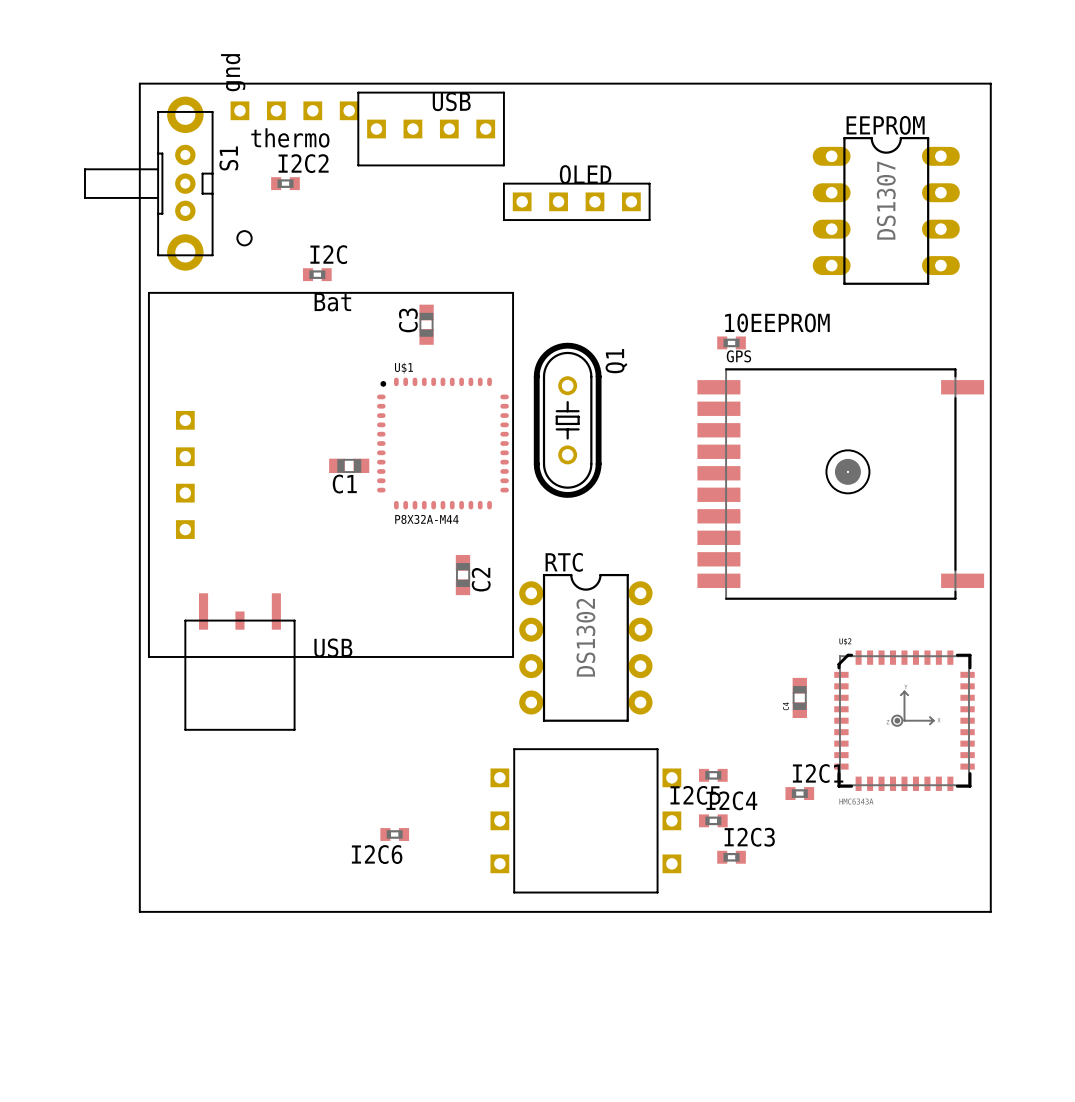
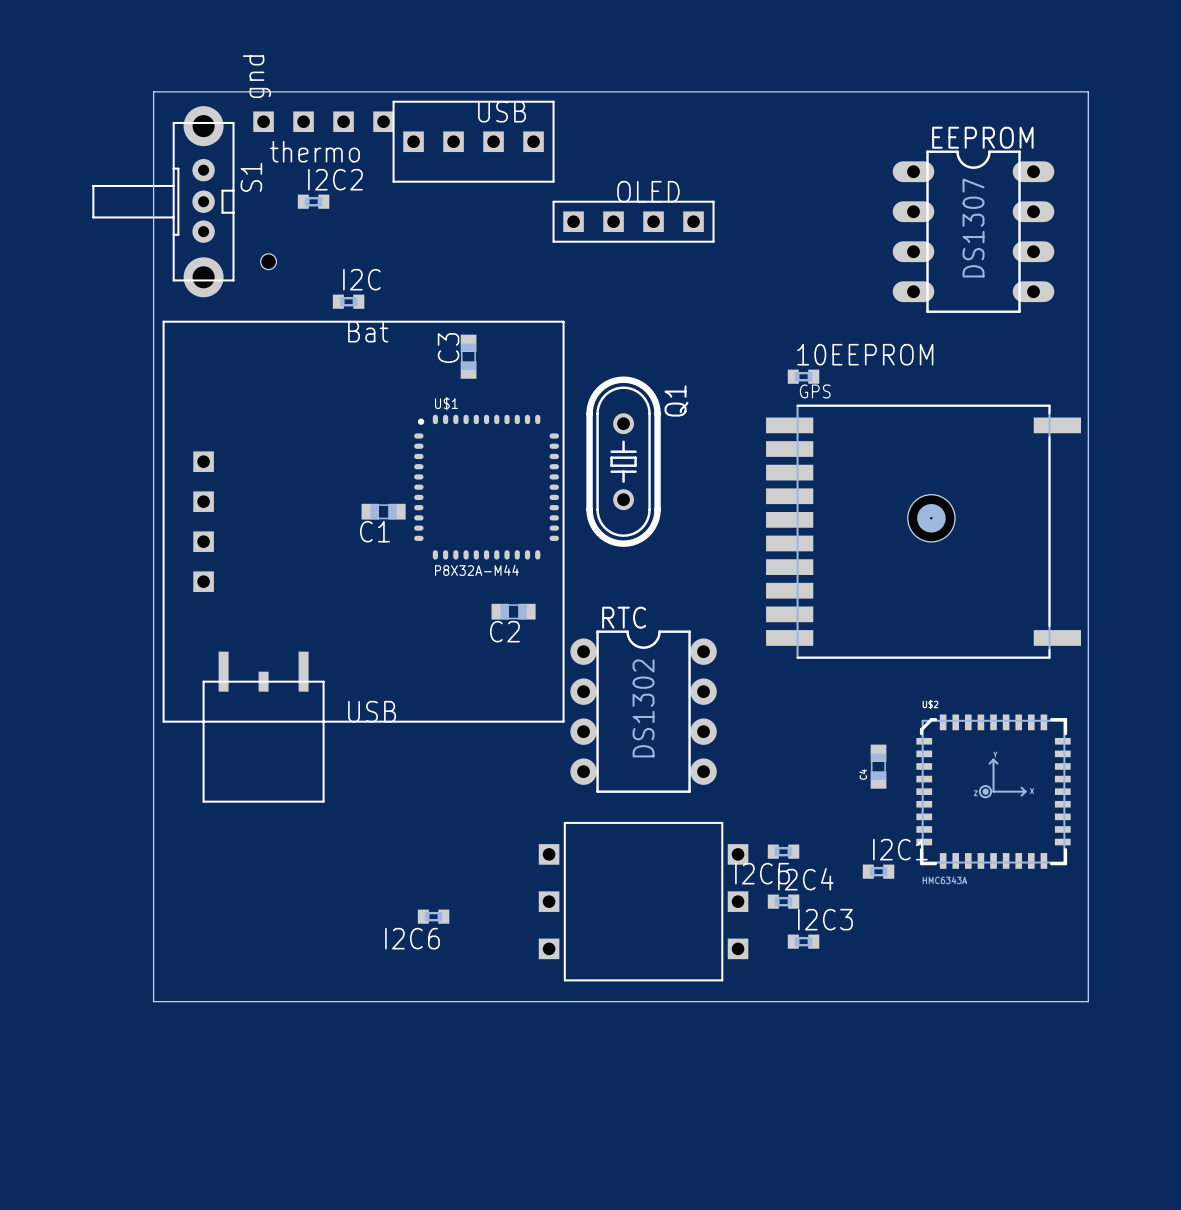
C2 rotation: 0° (462, 575) -> 90° clockwise (513, 611)

